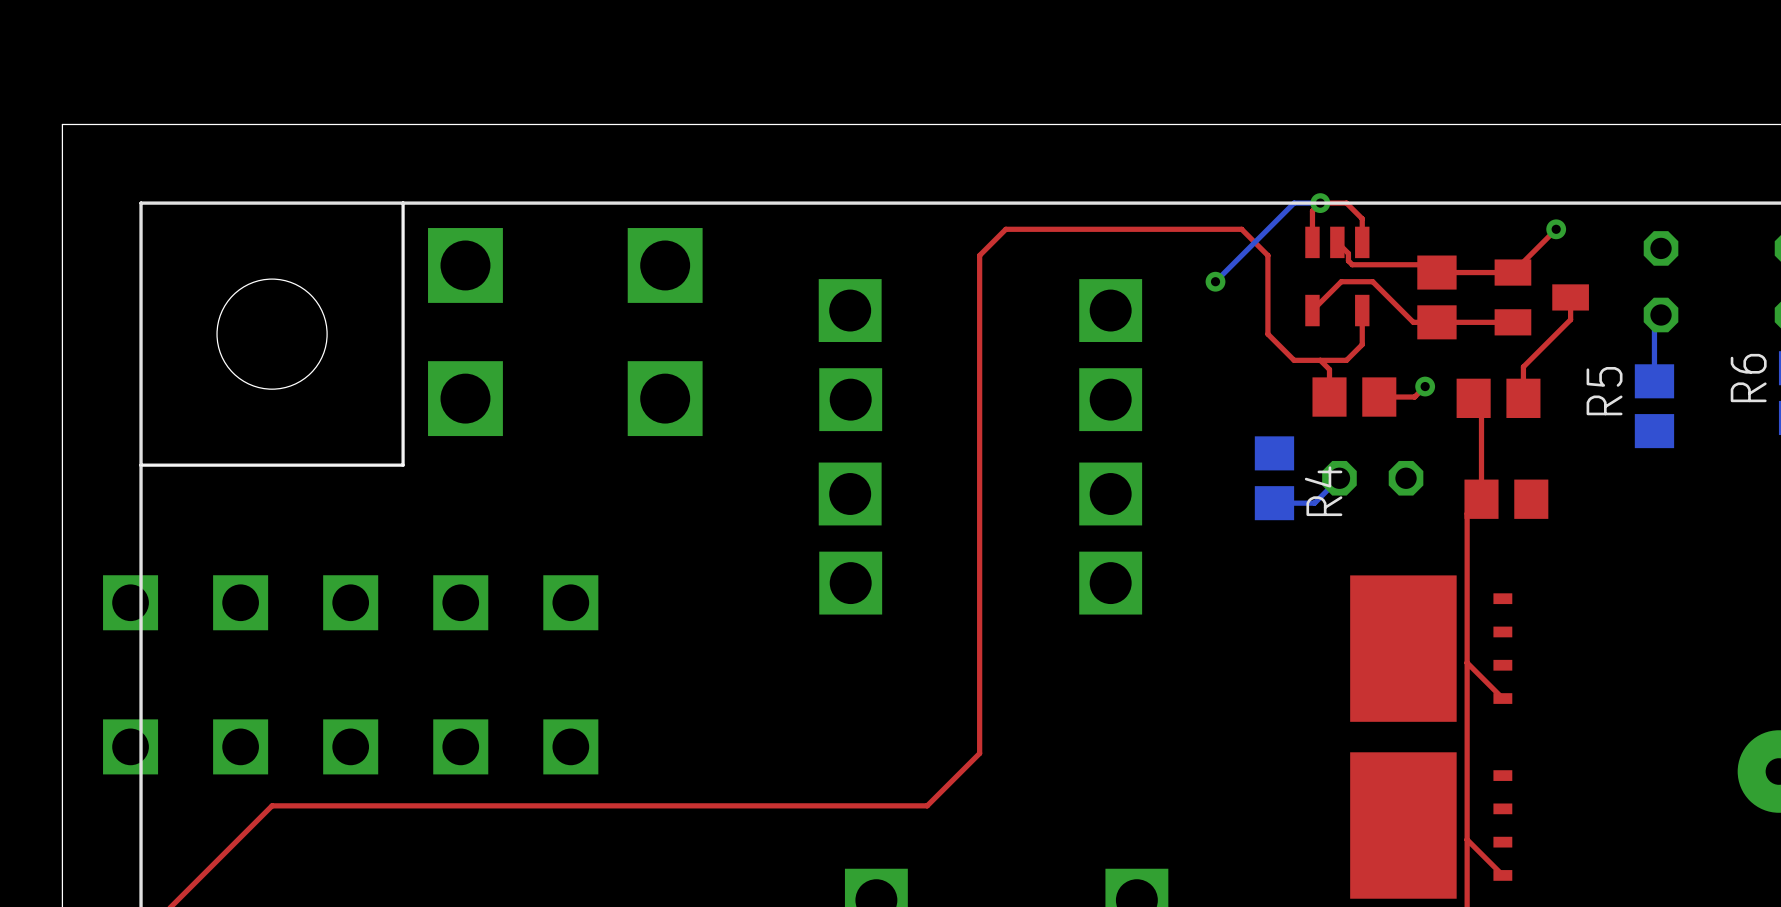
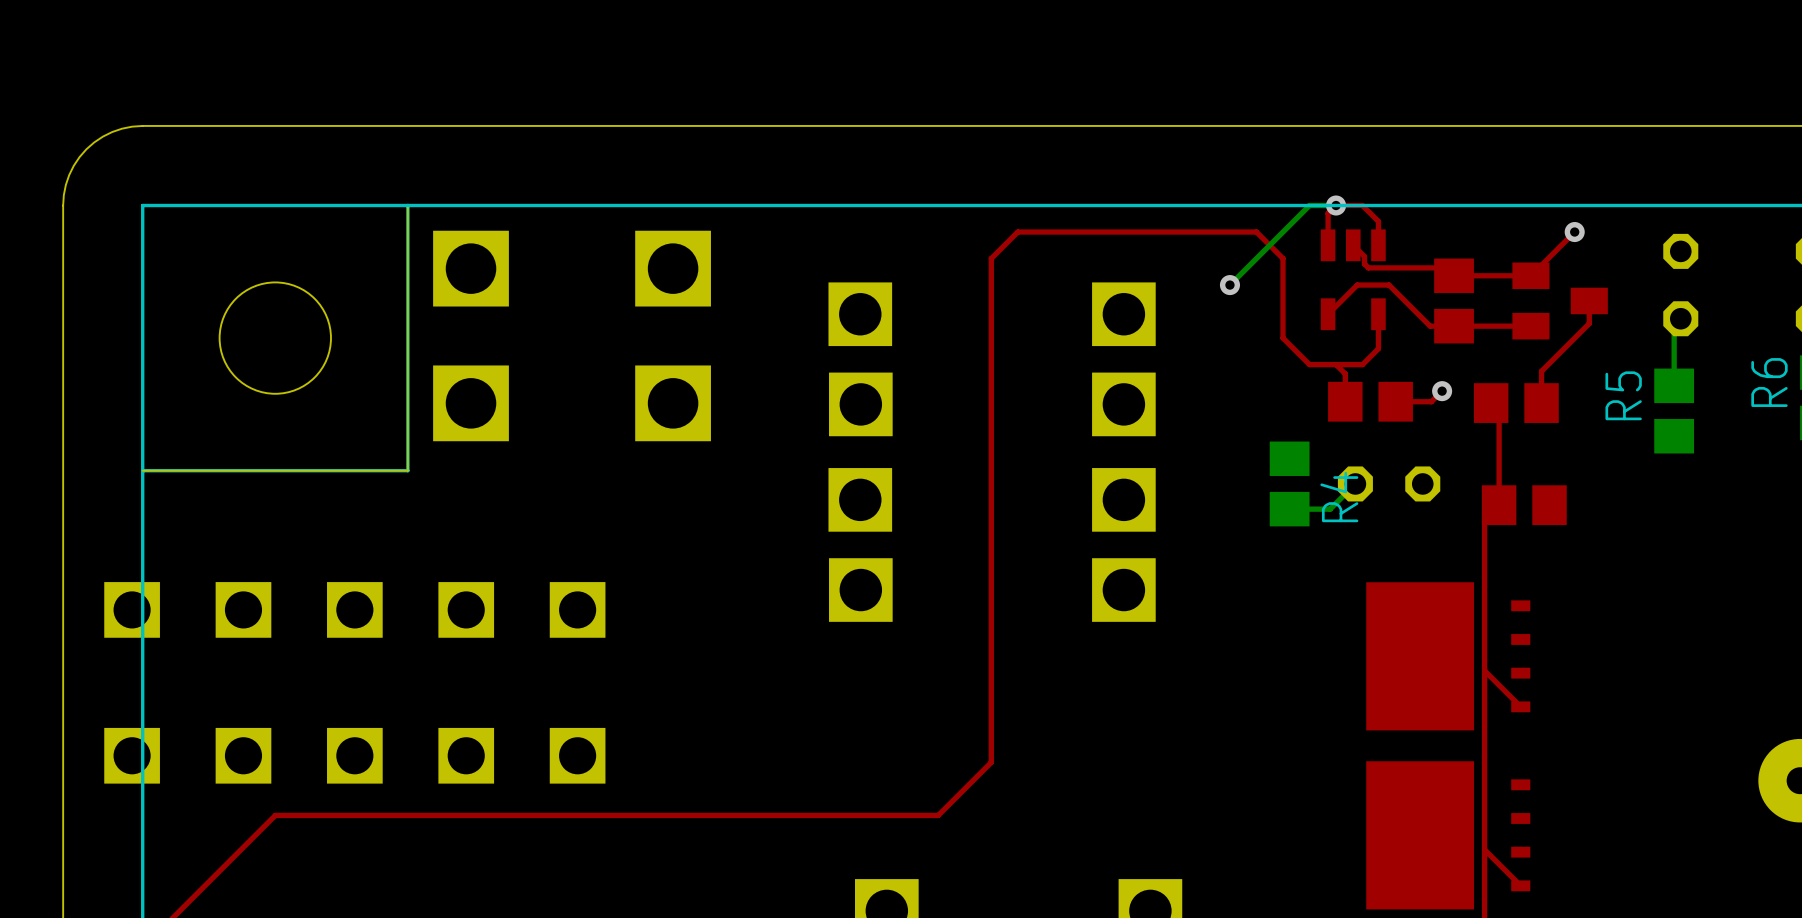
board edge: (141, 124) (62, 124) (62, 203) -> (142, 125) (112, 132) (86, 149) (69, 175) (63, 205)

